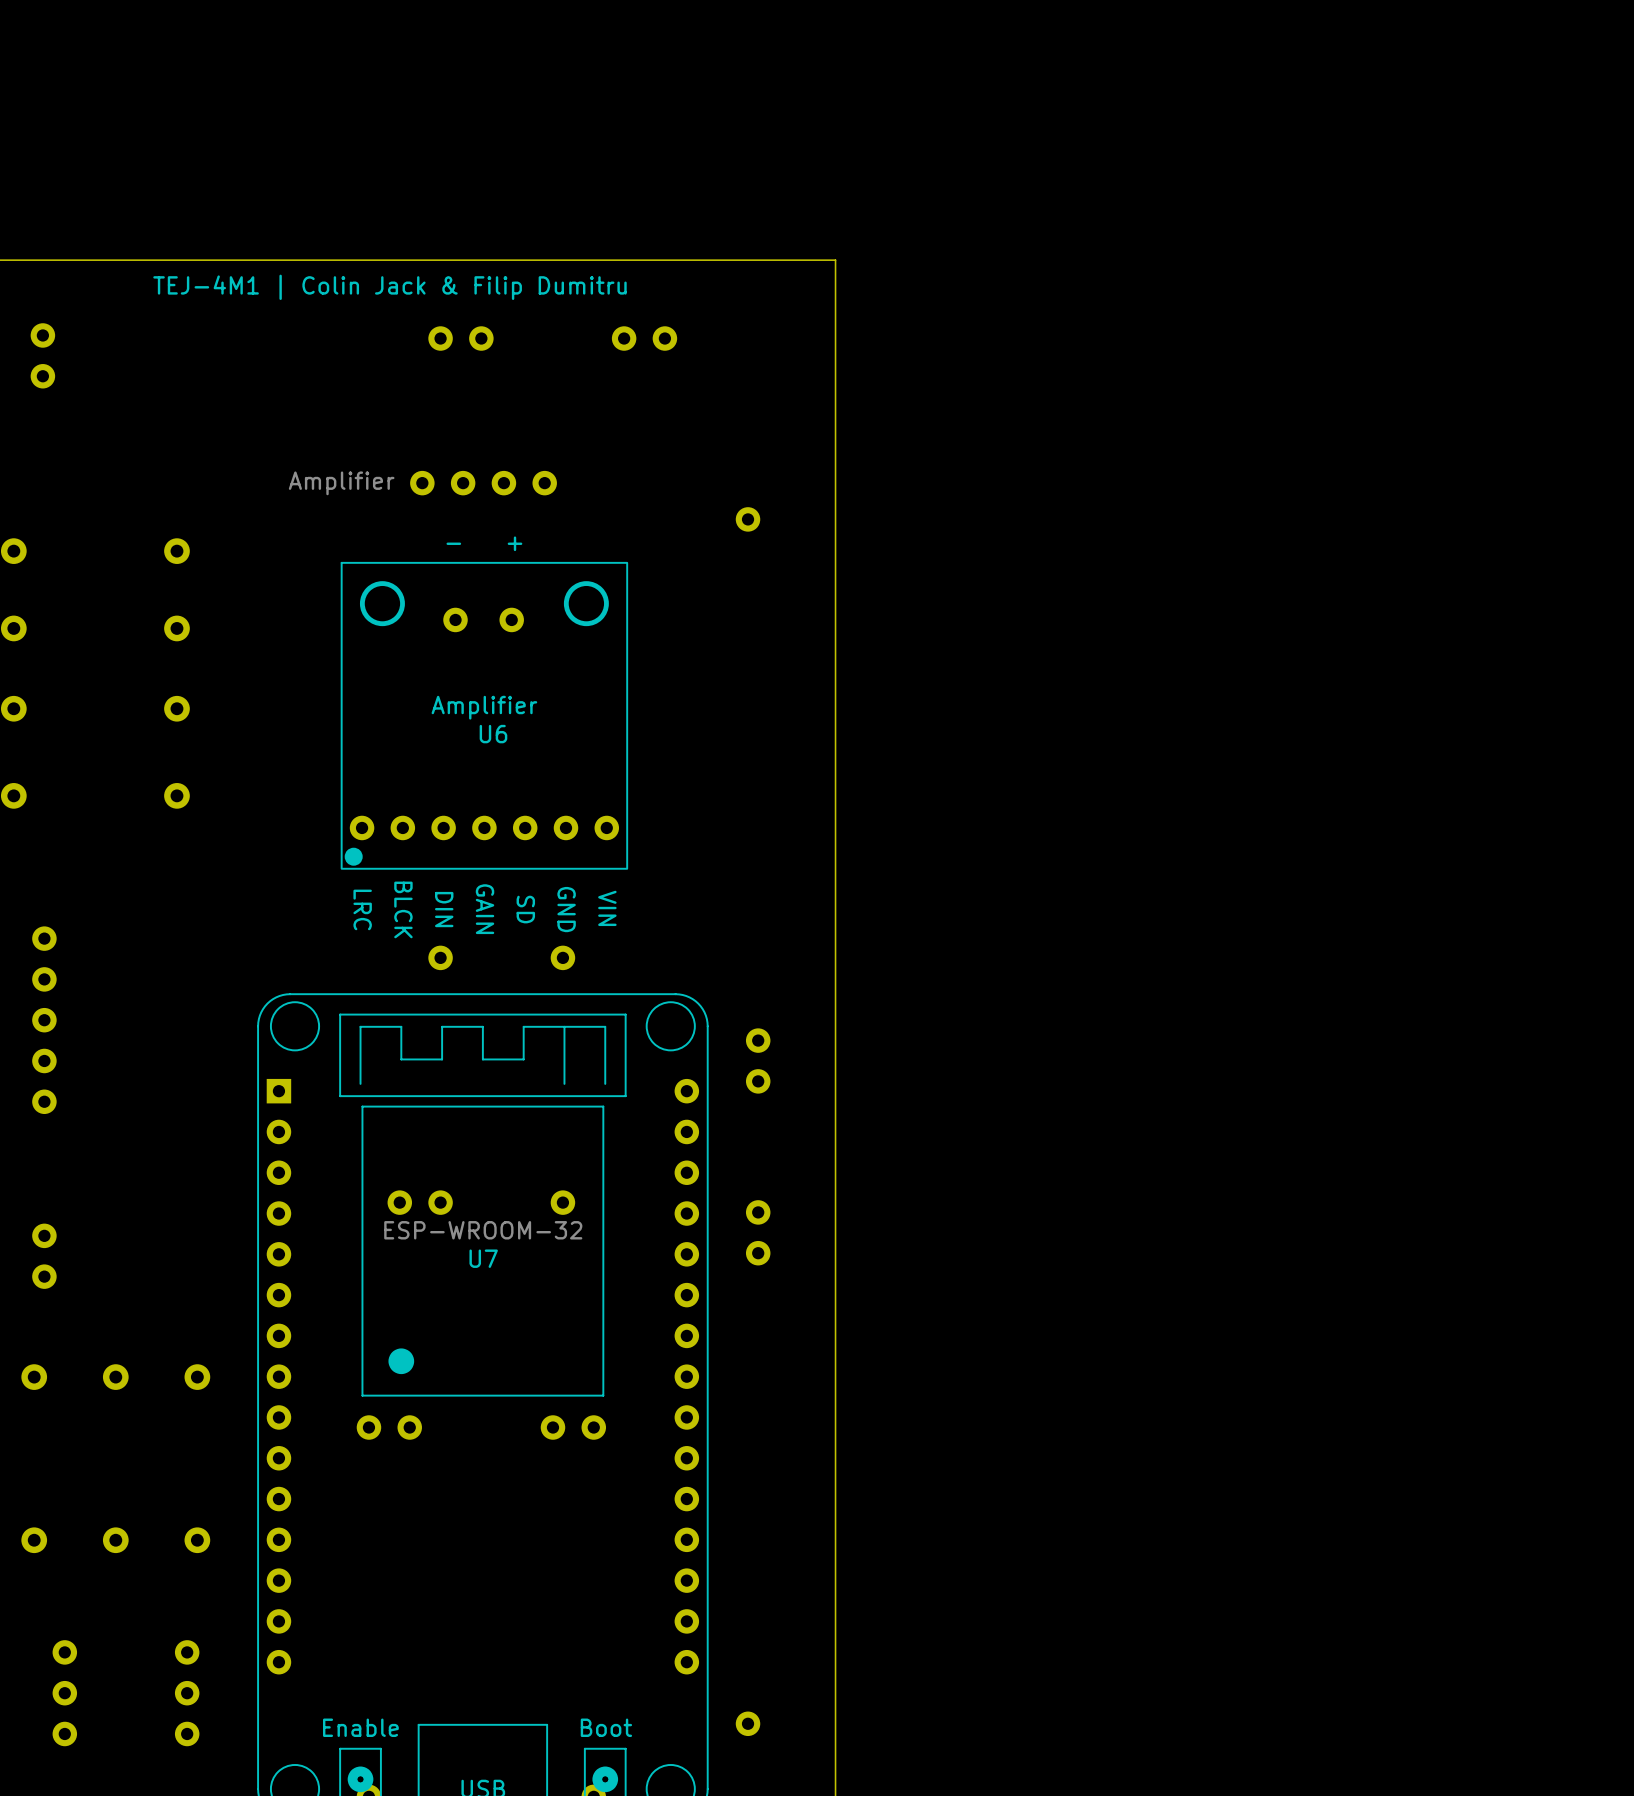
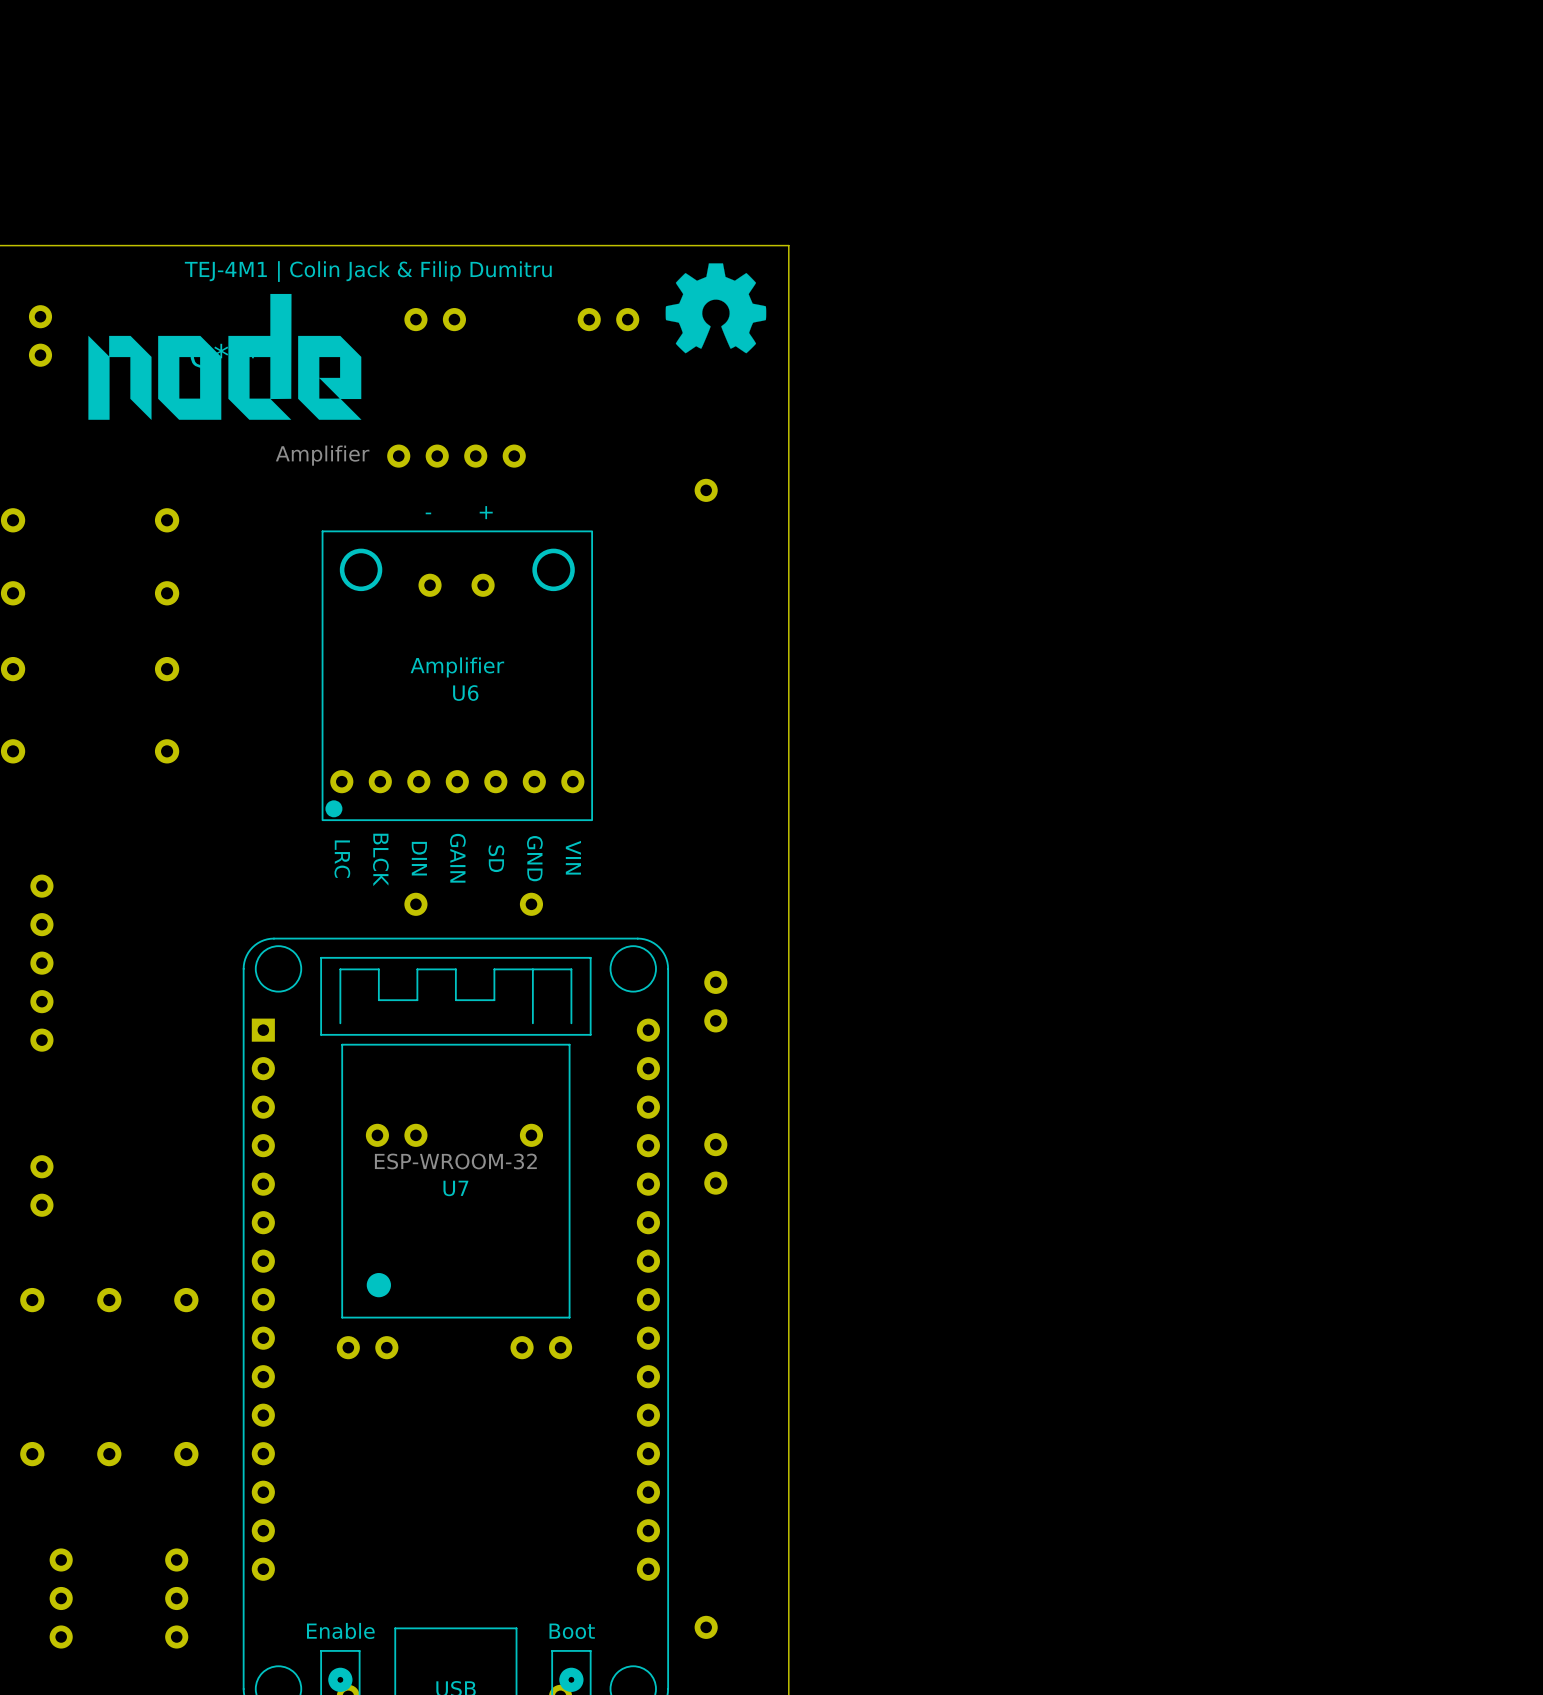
drawing: none -> [665, 263, 767, 354]
part: none -> (224, 356)

